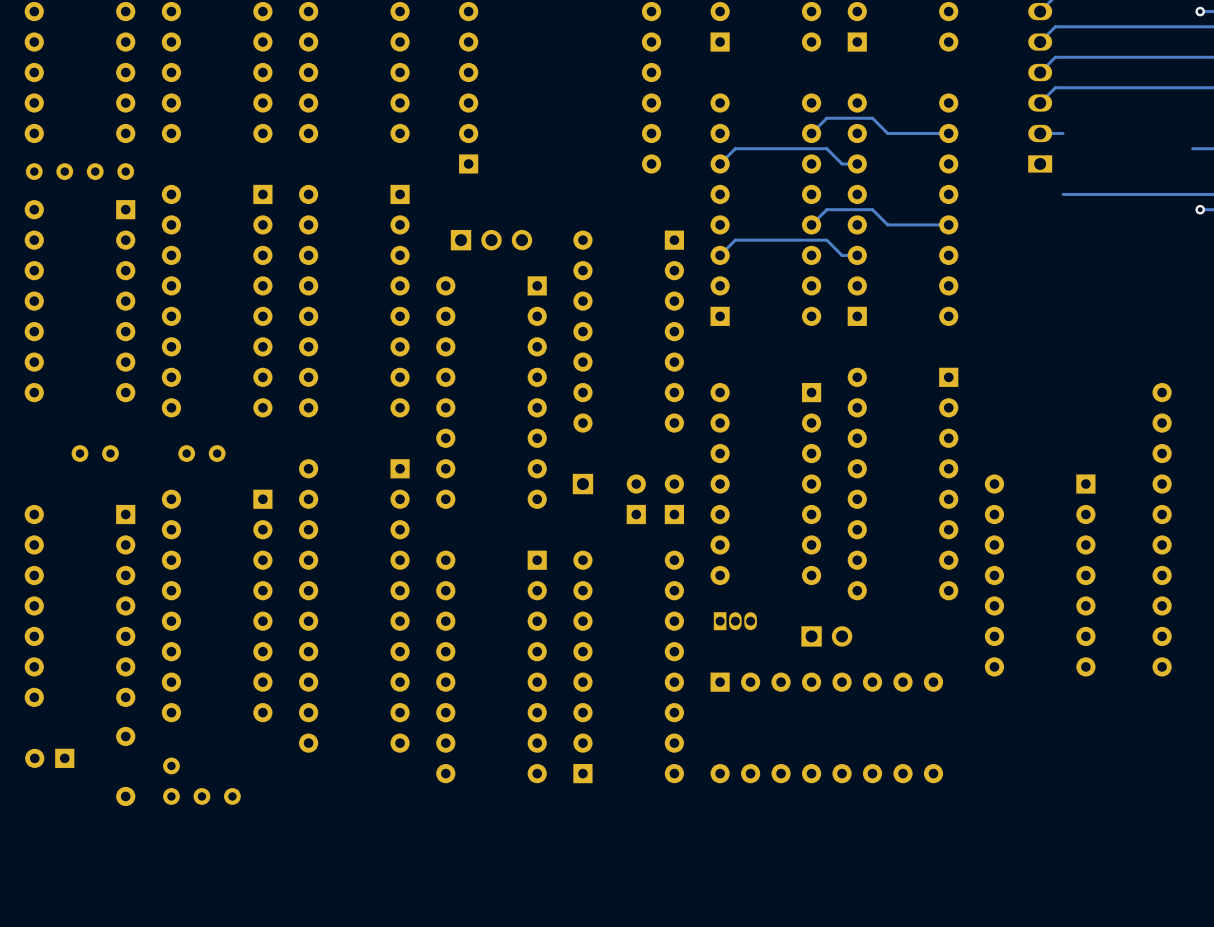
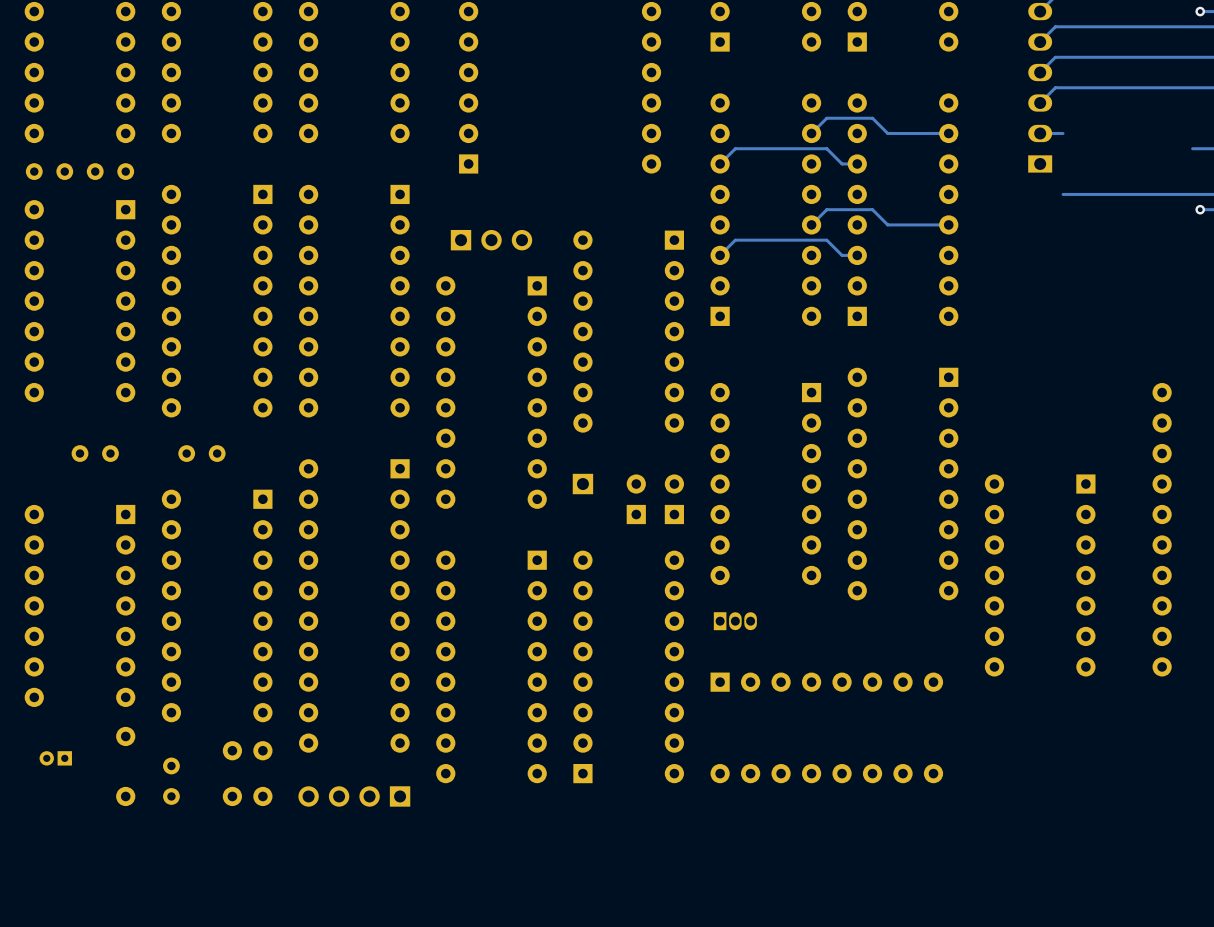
part: (826, 636) -> none
part footprint: [25, 748, 75, 768] -> [39, 751, 72, 766]
part: none -> (247, 750)
part: (217, 796) -> none
part: none -> (247, 796)
part: none -> (354, 796)

